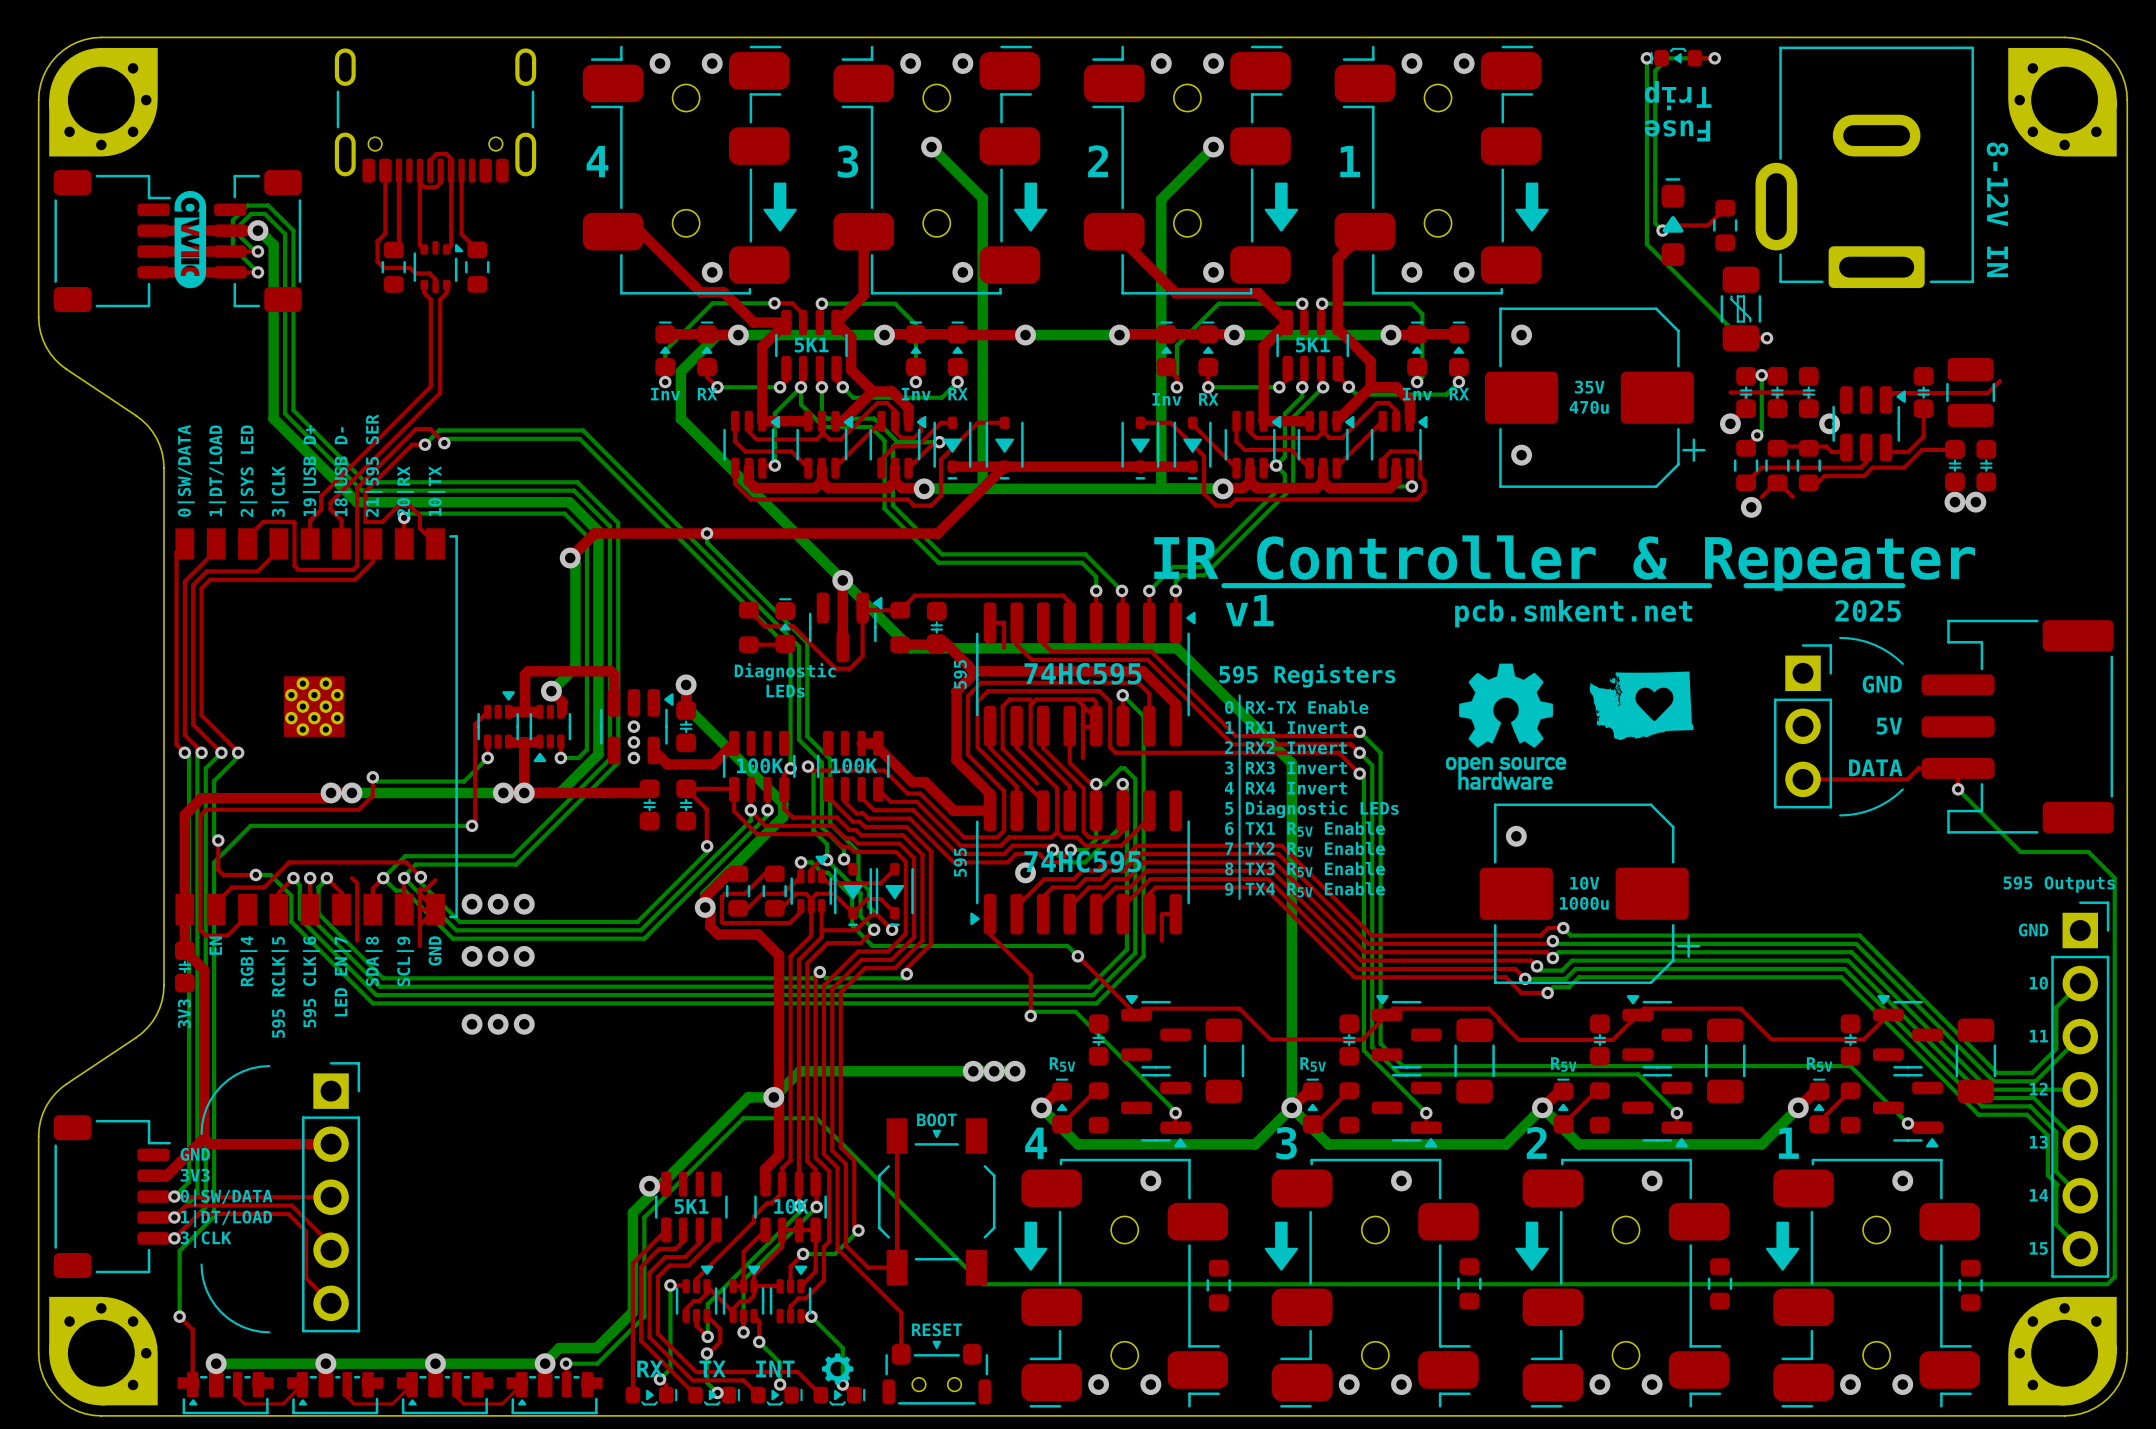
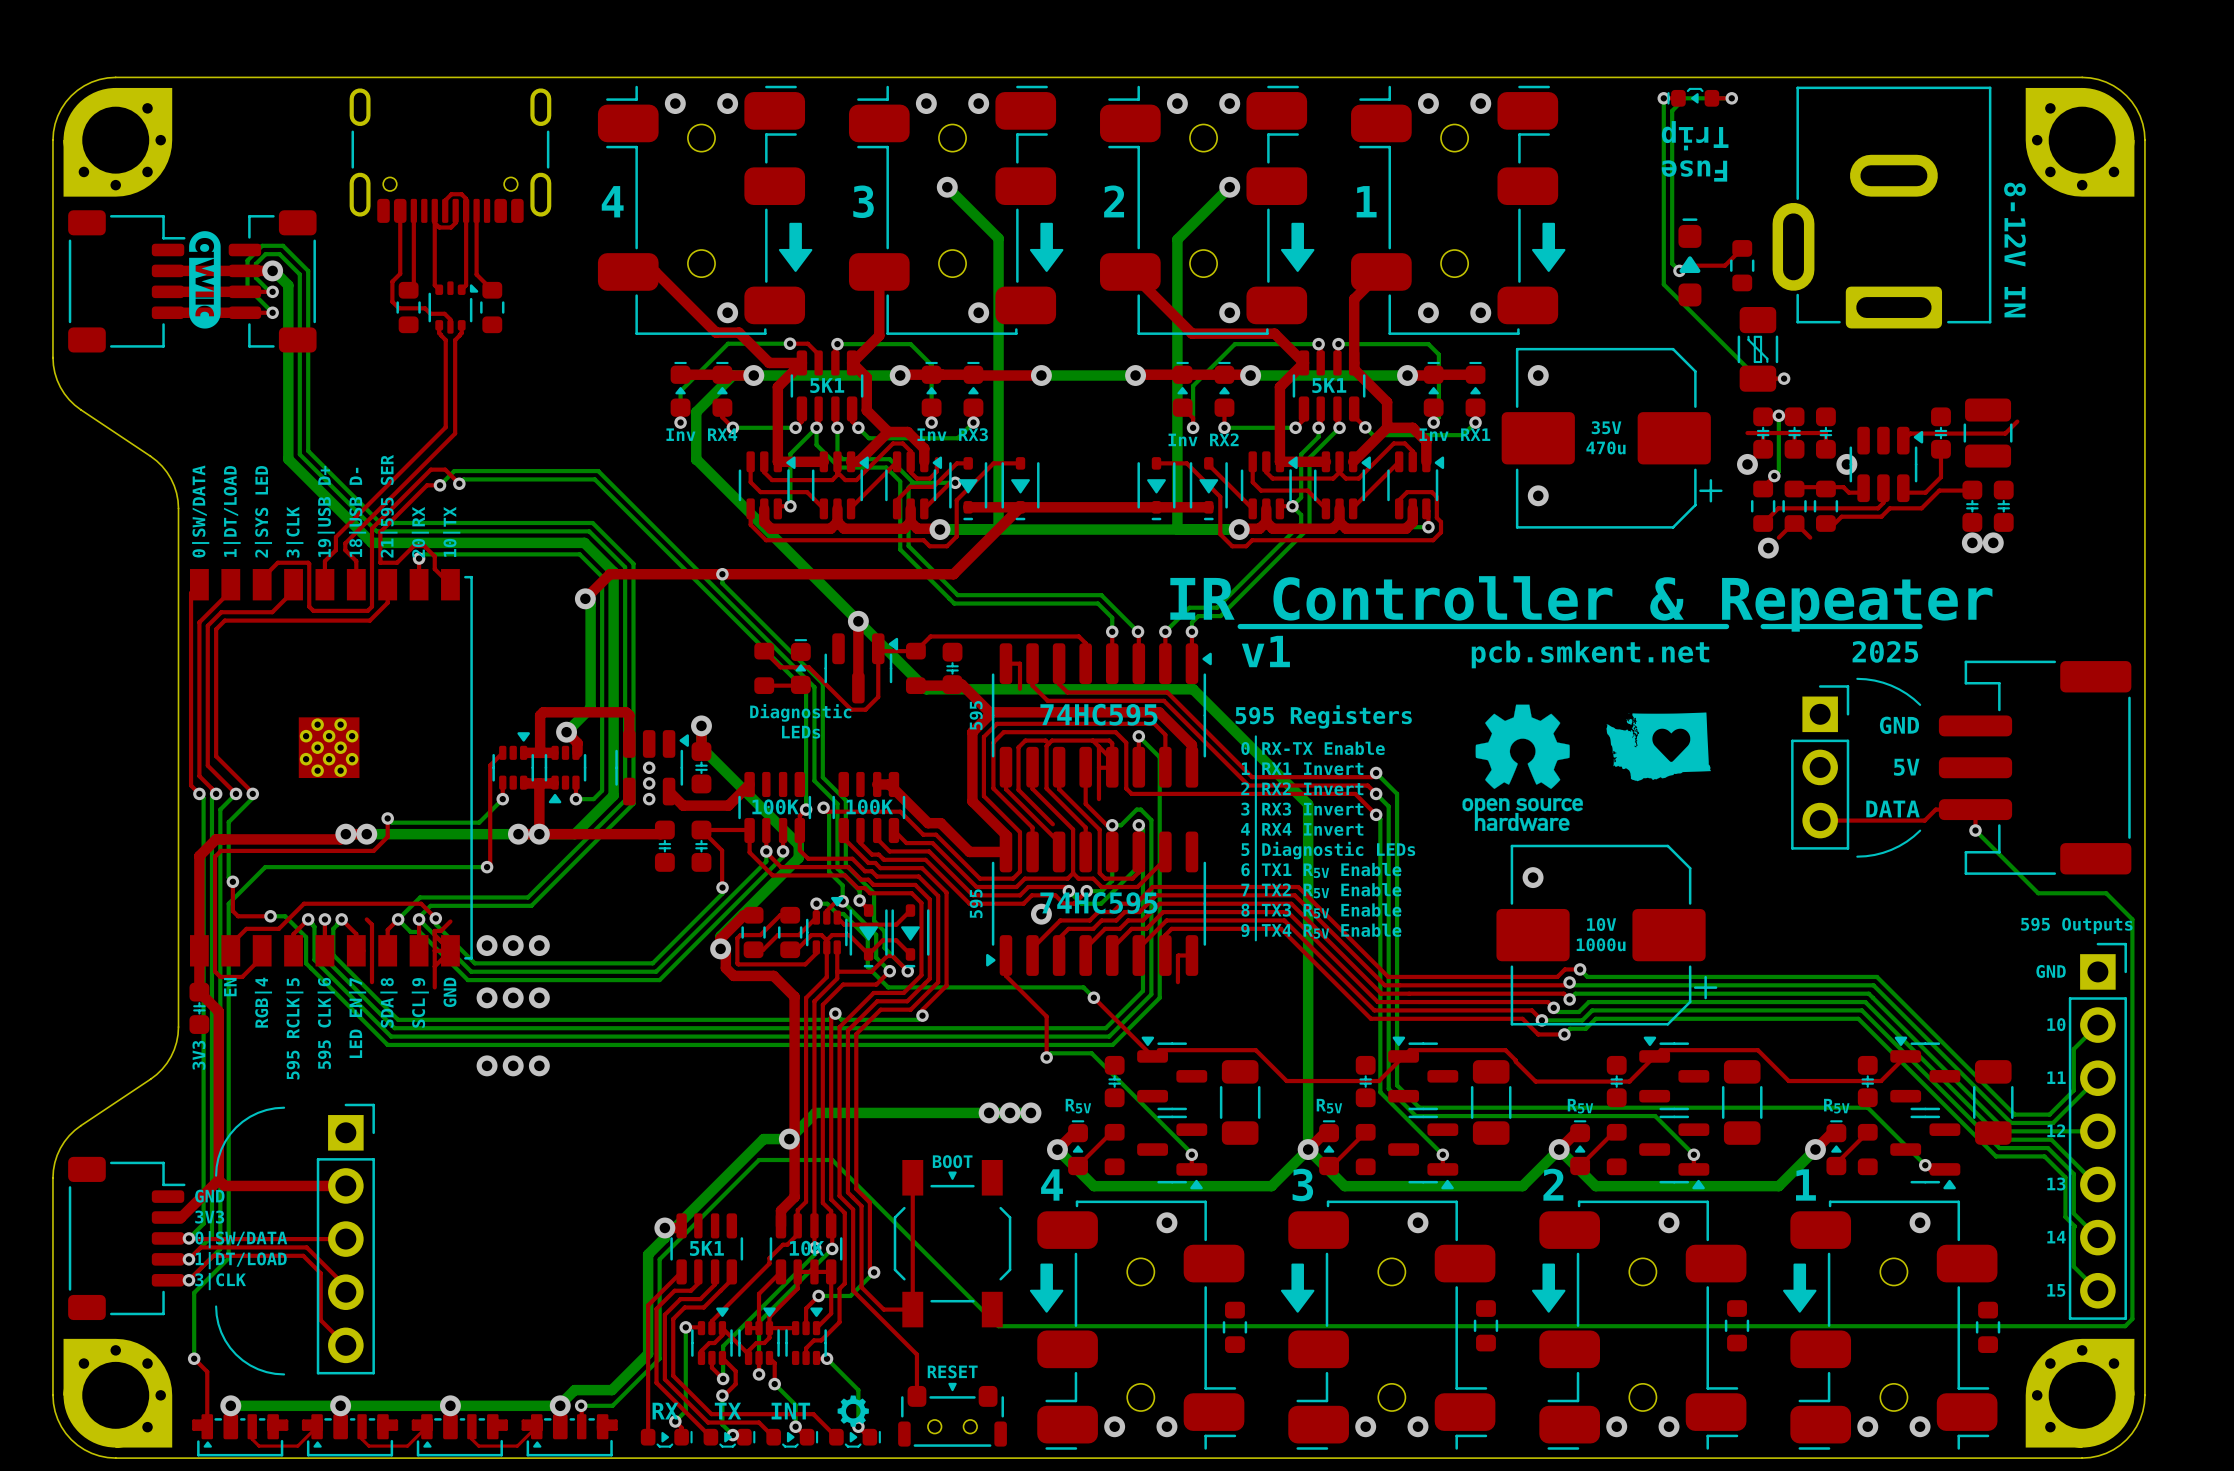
text: RX (707, 394) -> RX4 (722, 434)
text: RX (958, 394) -> RX3 (973, 434)
text: RX (1459, 394) -> RX1 (1475, 434)
text: RX (1208, 399) -> RX2 (1224, 439)

